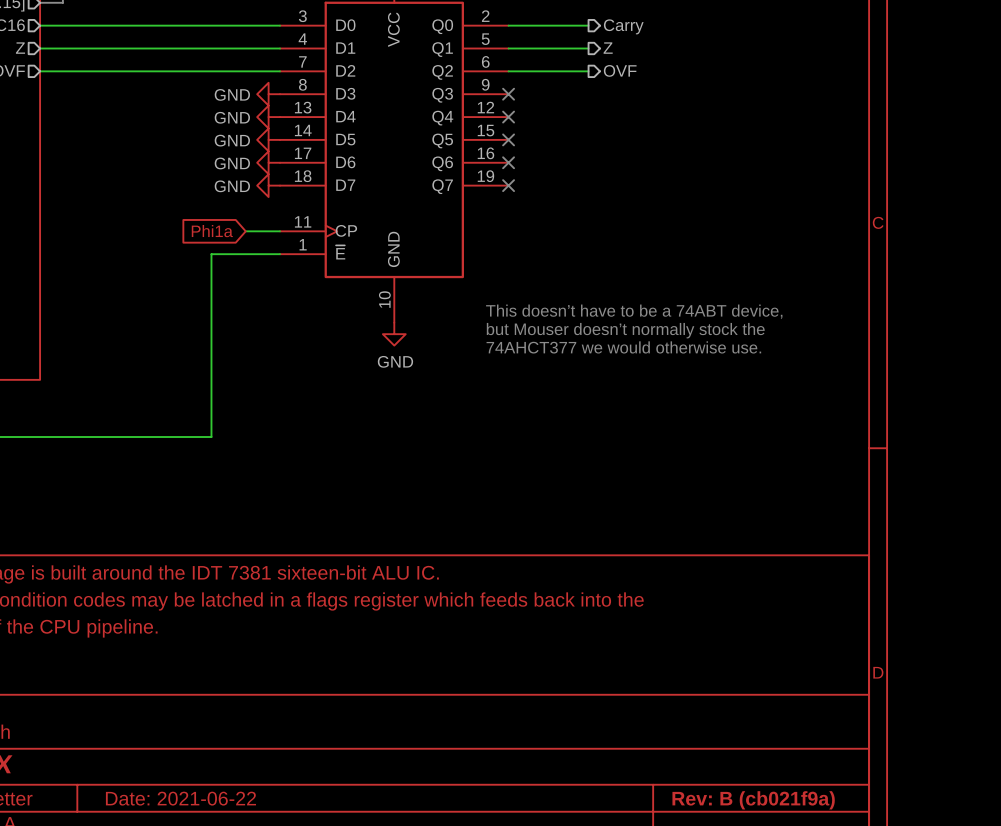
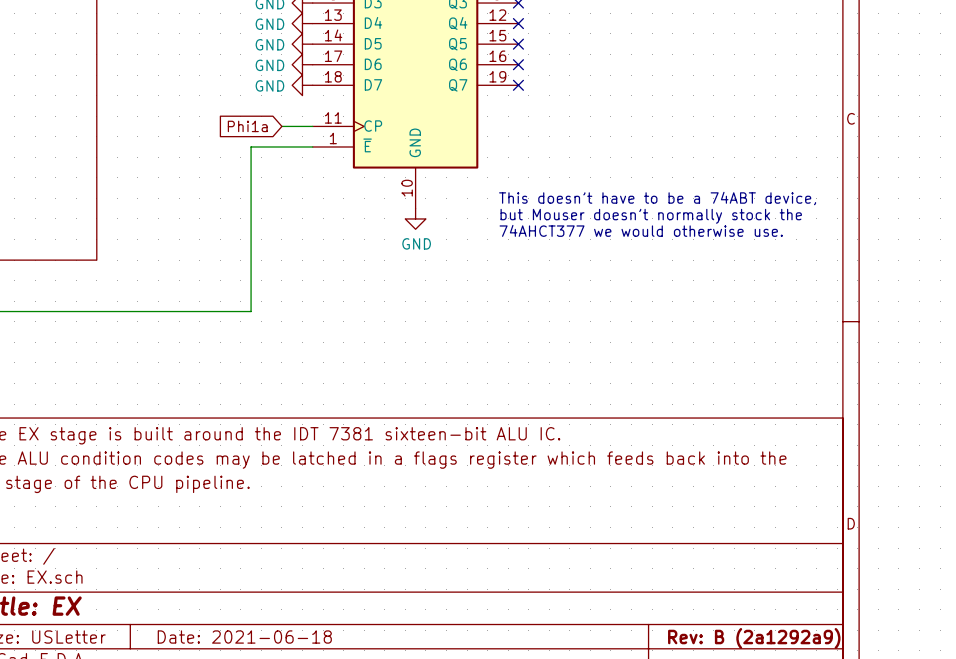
title block: Date: 2021-06-22 (180, 798) -> Date: 2021-06-18 (244, 637)
title block: Rev: B (cb021f9a) (753, 800) -> Rev: B (2a1292a9) (754, 638)

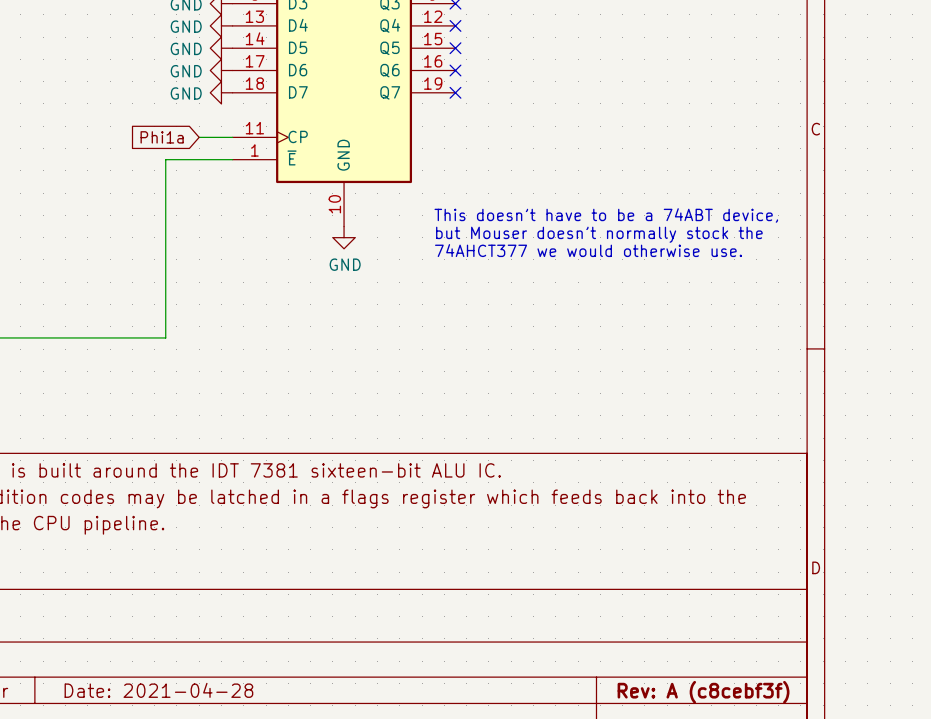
title block: Date: 2021-06-18 (244, 637) -> Date: 2021-04-28 (158, 690)
title block: Rev: B (2a1292a9) (754, 638) -> Rev: A (c8cebf3f) (703, 692)

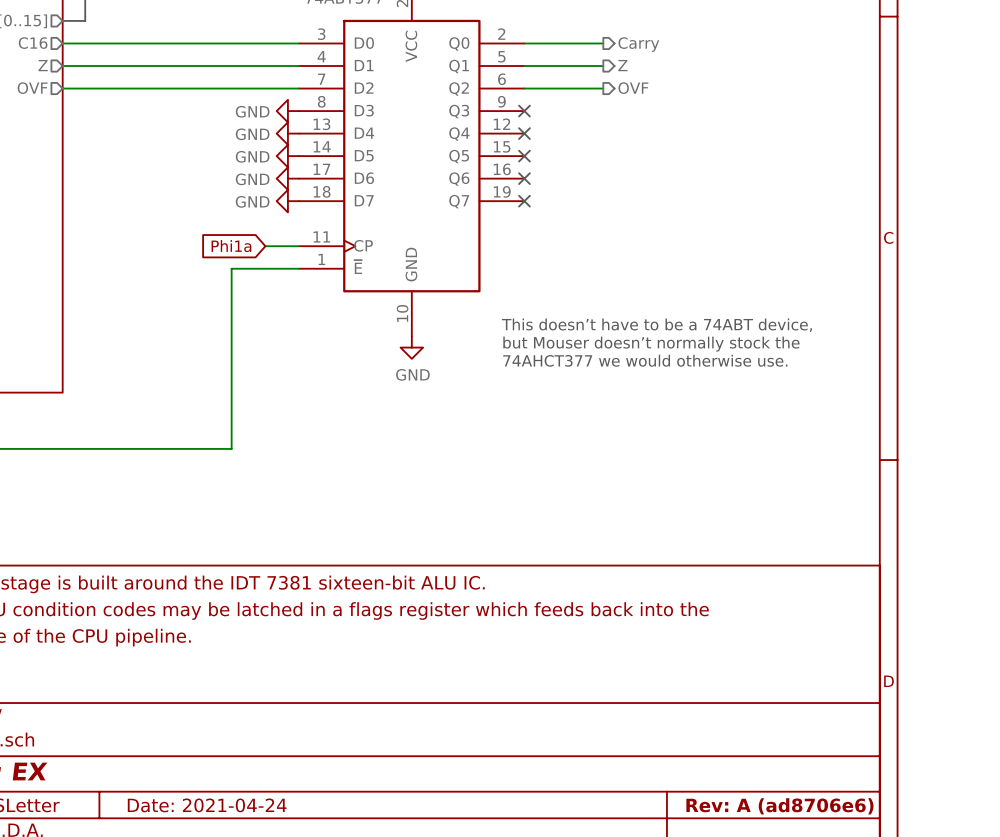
title block: Date: 2021-04-28 (158, 690) -> Date: 2021-04-24 (207, 805)
title block: Rev: A (c8cebf3f) (703, 692) -> Rev: A (ad8706e6) (779, 806)

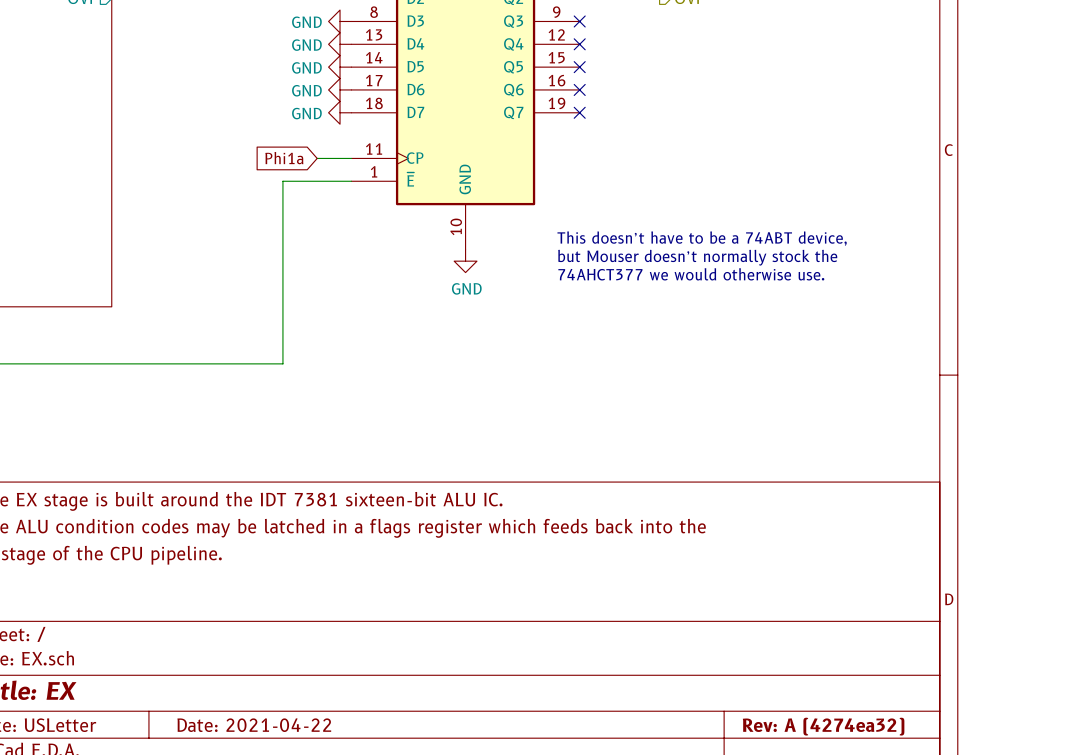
title block: Date: 2021-04-24 (207, 805) -> Date: 2021-04-22 (254, 725)
title block: Rev: A (ad8706e6) (779, 806) -> Rev: A (4274ea32) (823, 726)

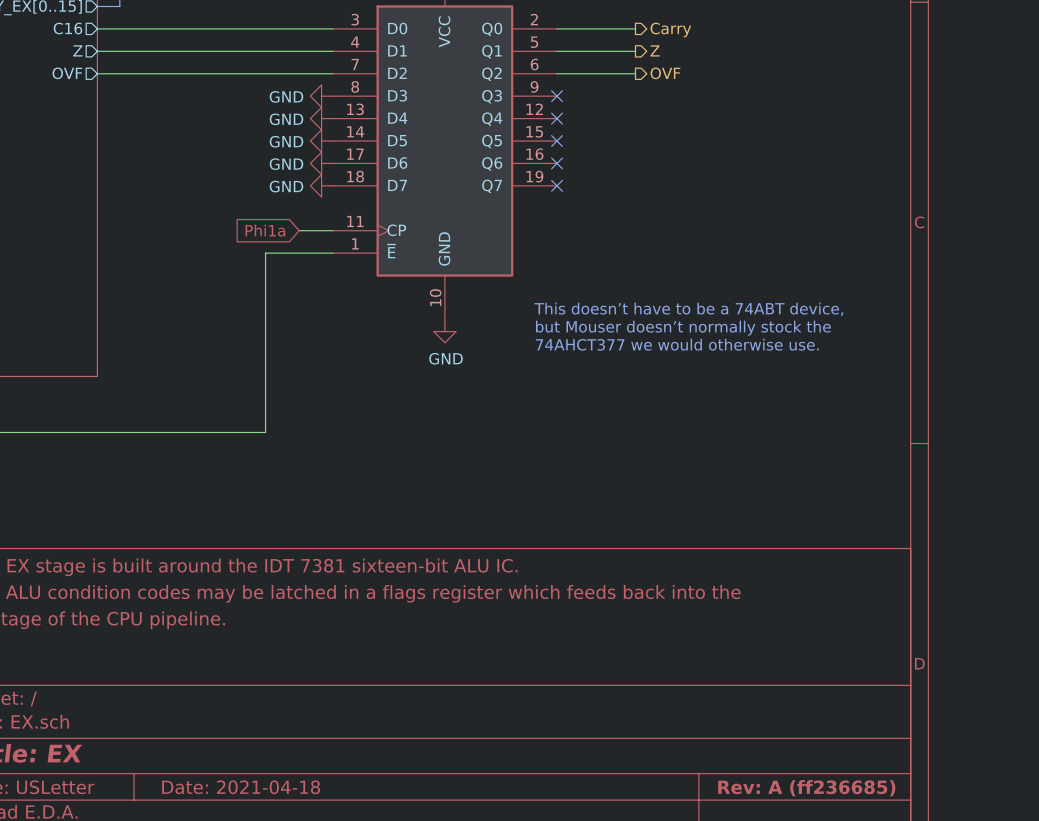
title block: Date: 2021-04-22 (254, 725) -> Date: 2021-04-18 (241, 787)
title block: Rev: A (4274ea32) (823, 726) -> Rev: A (ff236685) (806, 788)

